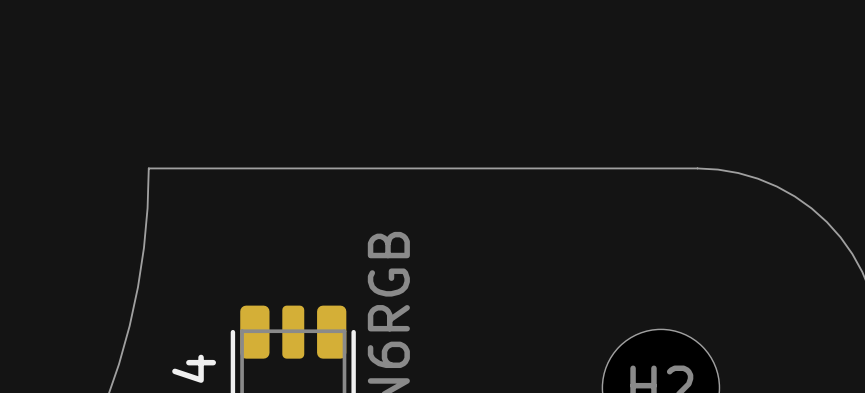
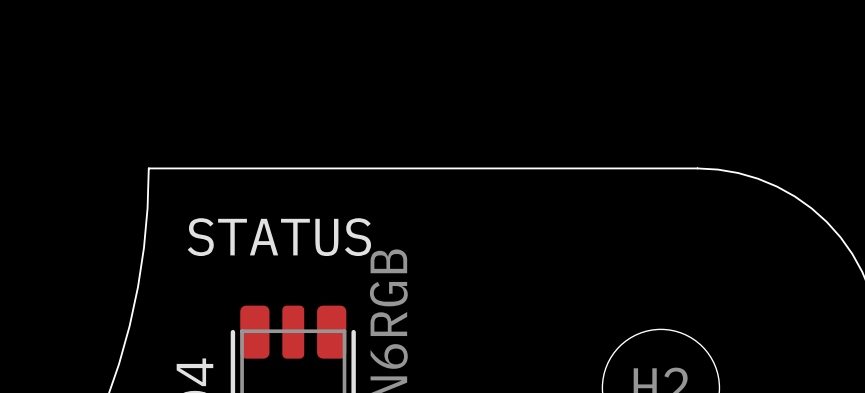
text: none -> STATUS (279, 237)

